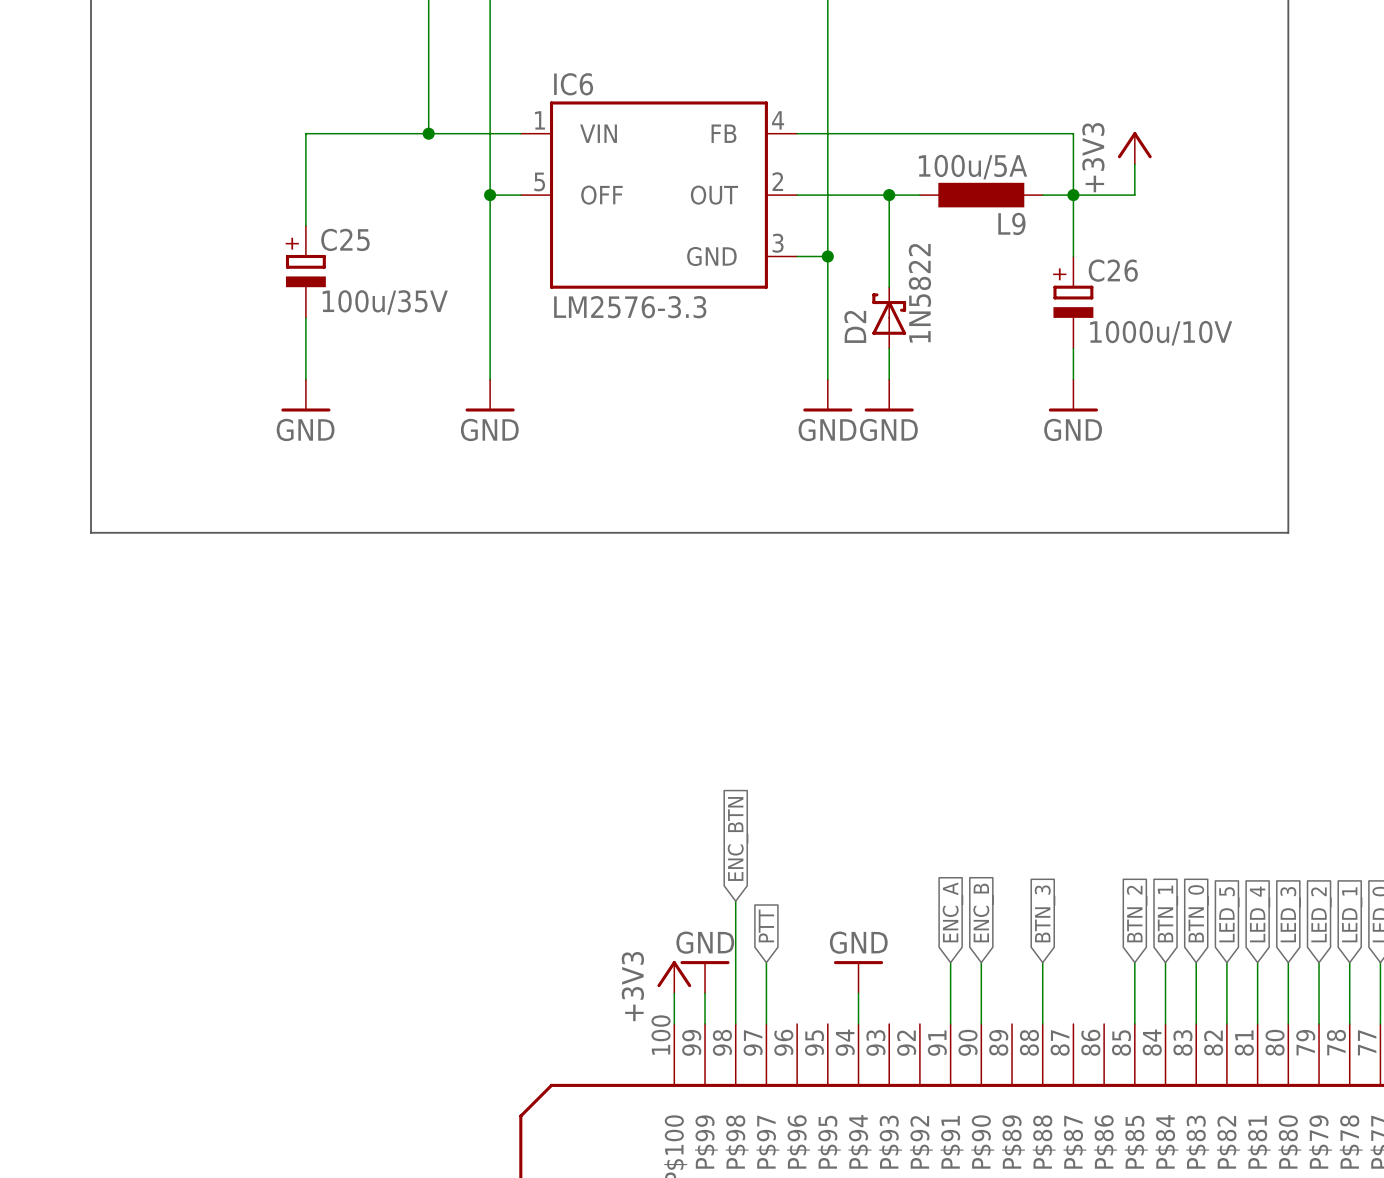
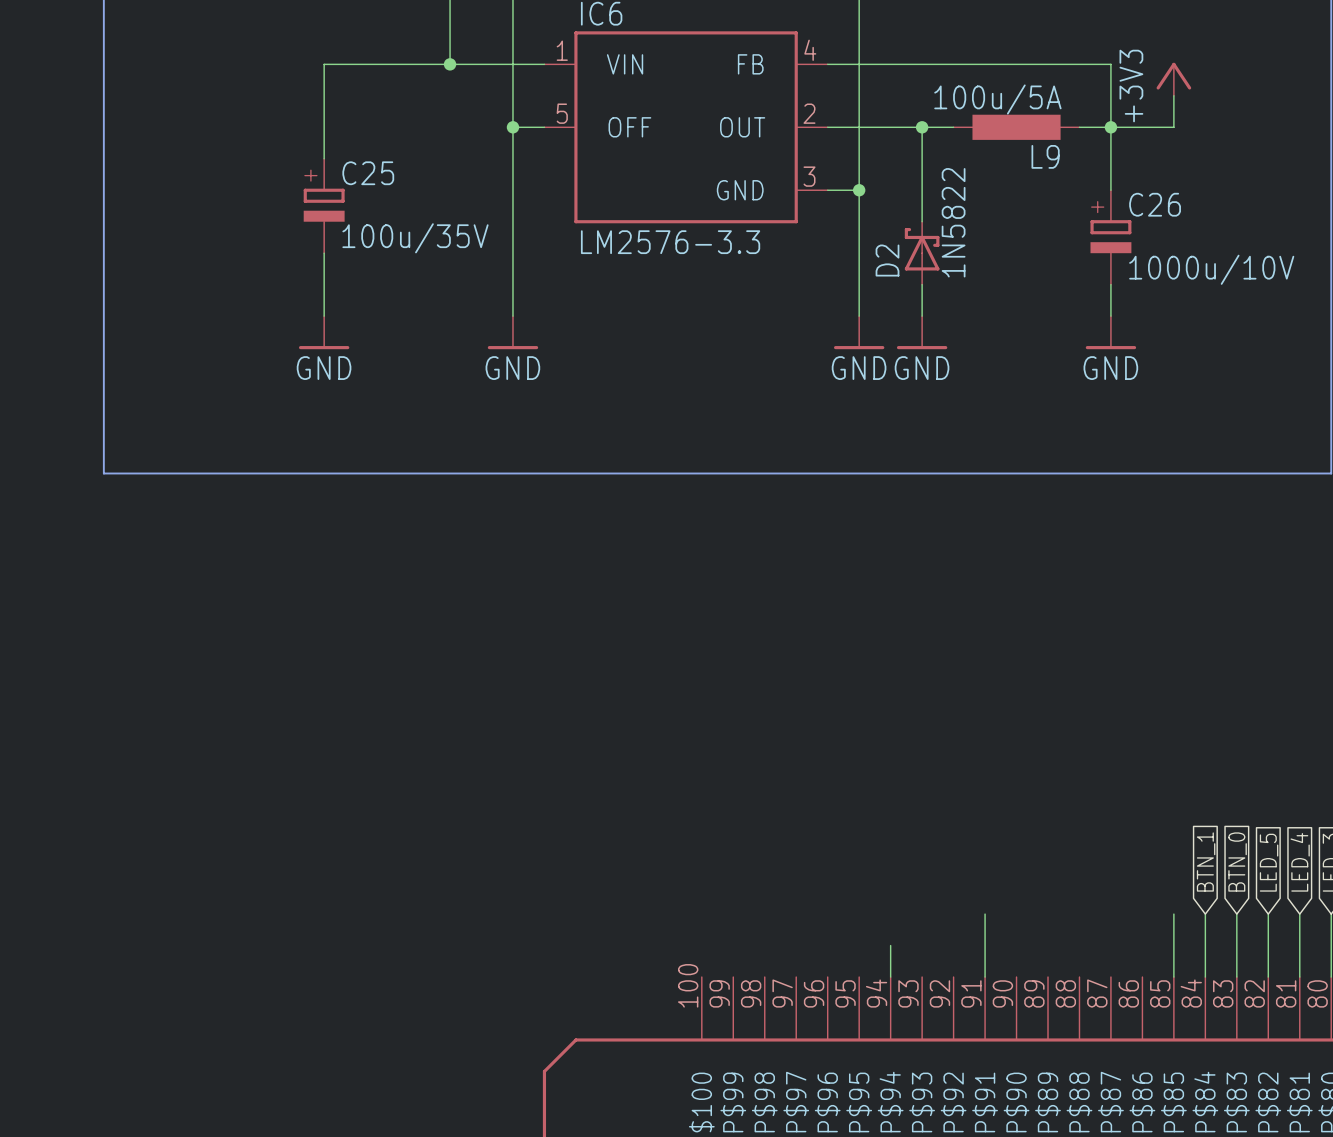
global label: ENC_BTN (738, 838) -> none
wire: (735, 901) (735, 1024) -> none
global label: ENC_A (952, 912) -> none
global label: ENC_B (983, 913) -> none
global label: BTN_3 (1045, 913) -> none
global label: BTN_2 (1137, 914) -> none
global label: PTT (766, 925) -> none
wire: (766, 962) (766, 1024) -> none
wire: (981, 962) (981, 1024) -> none
wire: (1042, 962) (1042, 1024) -> none
power symbol: +3V3 (674, 977) -> none
power symbol: GND (705, 977) -> none
power symbol: GND (858, 977) -> none
wire: (674, 993) (674, 1024) -> none
wire: (705, 993) (705, 1024) -> none

